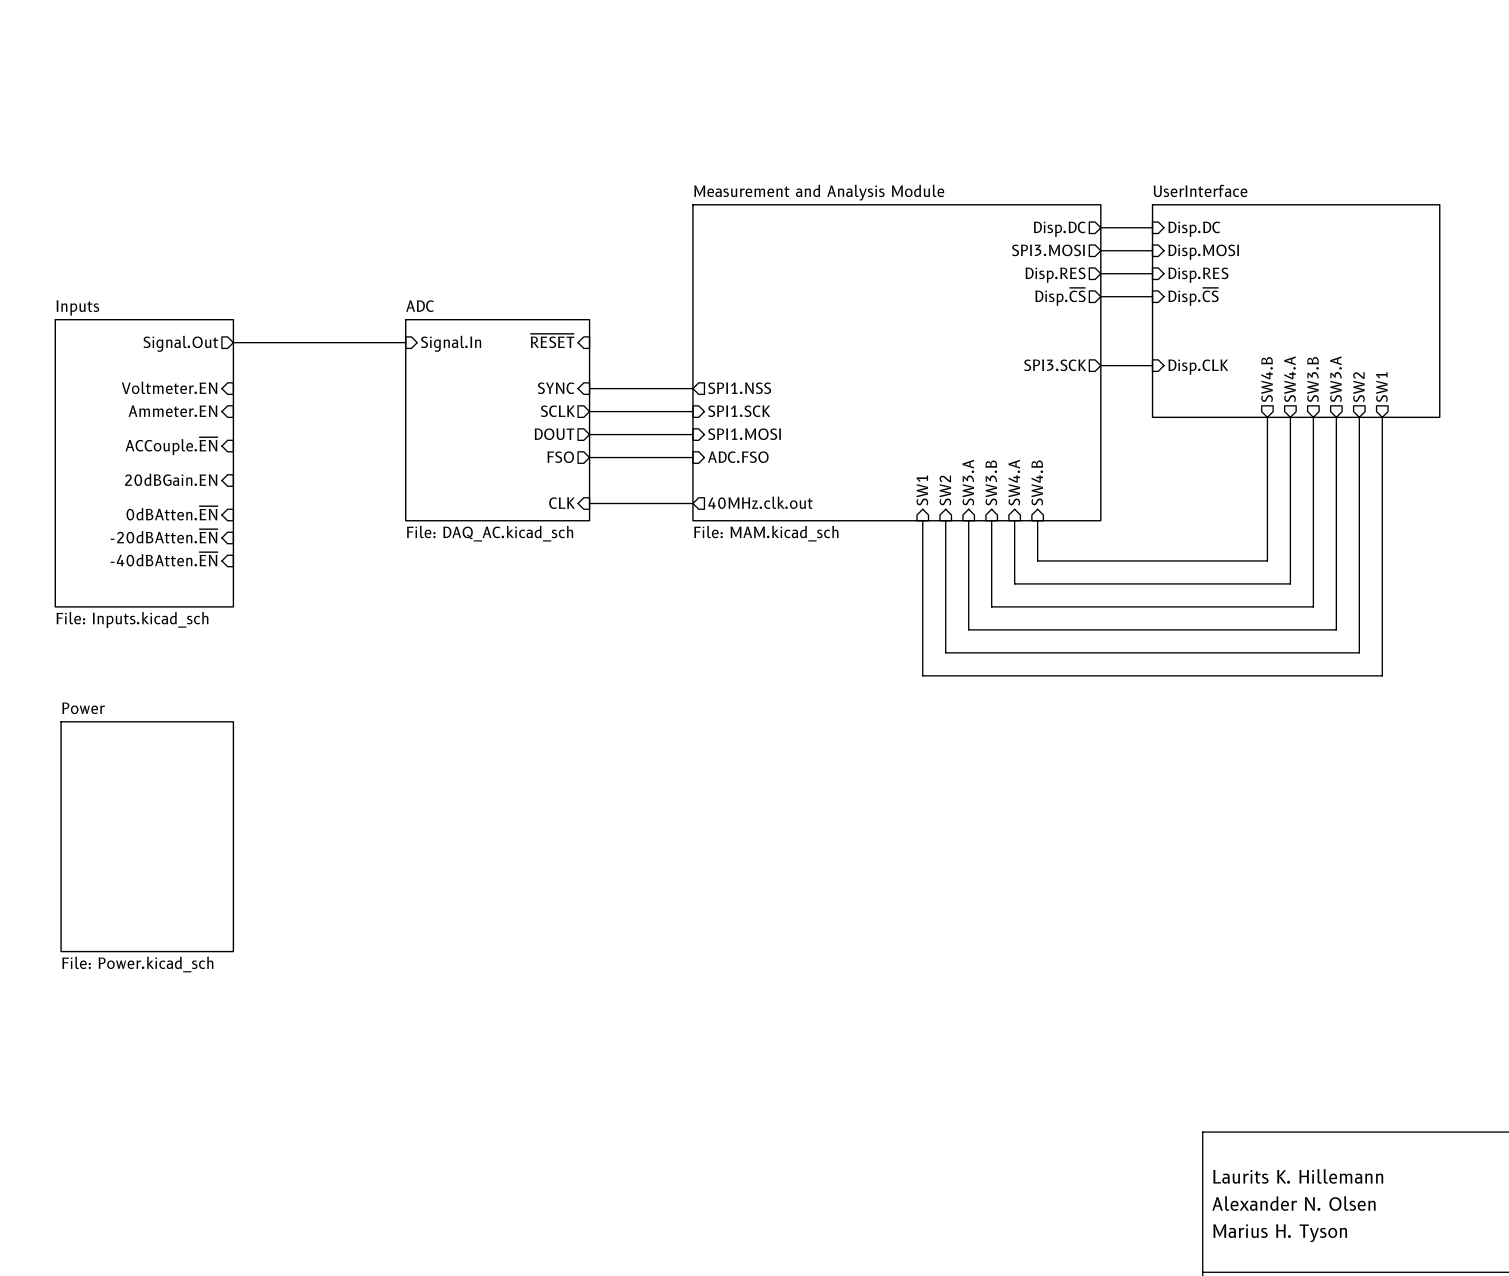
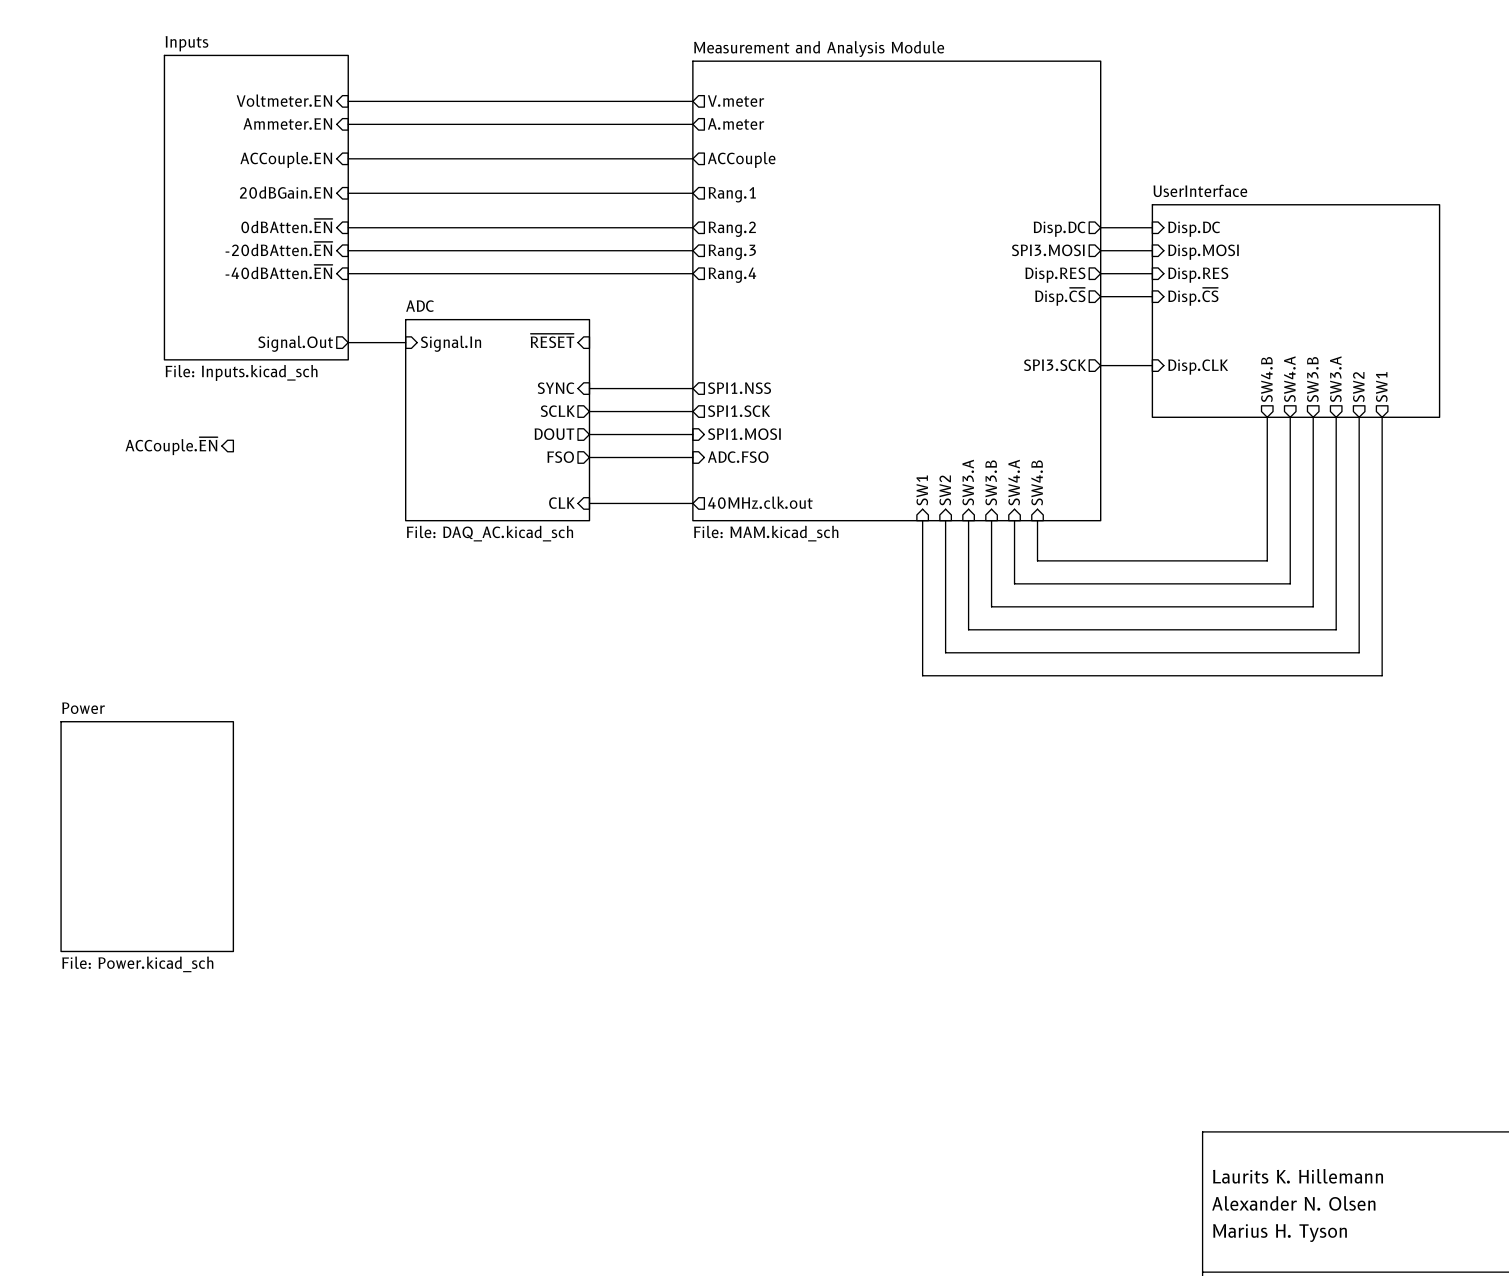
sheet pin: none -> Voltmeter.EN (284, 100)
wire: none -> (348, 101) (692, 101)
sheet pin: none -> V.meter (736, 101)
sheet pin: none -> Ammeter.EN (287, 123)
wire: none -> (348, 124) (692, 124)
sheet pin: none -> A.meter (736, 123)
wire: none -> (348, 158) (692, 158)
sheet pin: none -> ACCouple.EN (286, 159)
sheet pin: none -> ACCouple (741, 159)
sheet pin: none -> 20dBGain.EN (286, 192)
wire: none -> (348, 193) (692, 193)
sheet pin: none -> Rang.1 (732, 194)
sheet Inputs: none -> File: Inputs.kicad_sch (256, 207)
sheet pin: none -> 0dBAtten.~{EN} (286, 226)
wire: none -> (348, 227) (692, 227)
sheet pin: none -> Rang.2 (732, 229)
sheet pin: none -> -20dBAtten.~{EN} (279, 249)
wire: none -> (348, 250) (692, 250)
sheet pin: none -> Rang.3 (732, 252)
sheet pin: none -> -40dBAtten.~{EN} (279, 272)
wire: none -> (348, 273) (692, 273)
sheet pin: none -> Rang.4 (732, 275)
sheet Measurement and Analysis Module: none -> File: MAM.kicad_sch (896, 290)
wire: (233, 342) (348, 342) -> none
sheet pin position: Signal.Out (180, 343) -> Signal.Out (295, 343)
sheet Measurement and Analysis Module: File: MAM.kicad_sch (896, 362) -> none
sheet pin: Voltmeter.EN (169, 387) -> none
sheet pin: Ammeter.EN (172, 411) -> none
sheet pin shape: input (739, 411) -> output (739, 411)
sheet Inputs: File: Inputs.kicad_sch (144, 463) -> none
sheet pin: 20dBGain.EN (171, 479) -> none
sheet pin: 0dBAtten.~{EN} (172, 513) -> none
sheet pin: -20dBAtten.~{EN} (164, 536) -> none
sheet pin: -40dBAtten.~{EN} (164, 559) -> none

